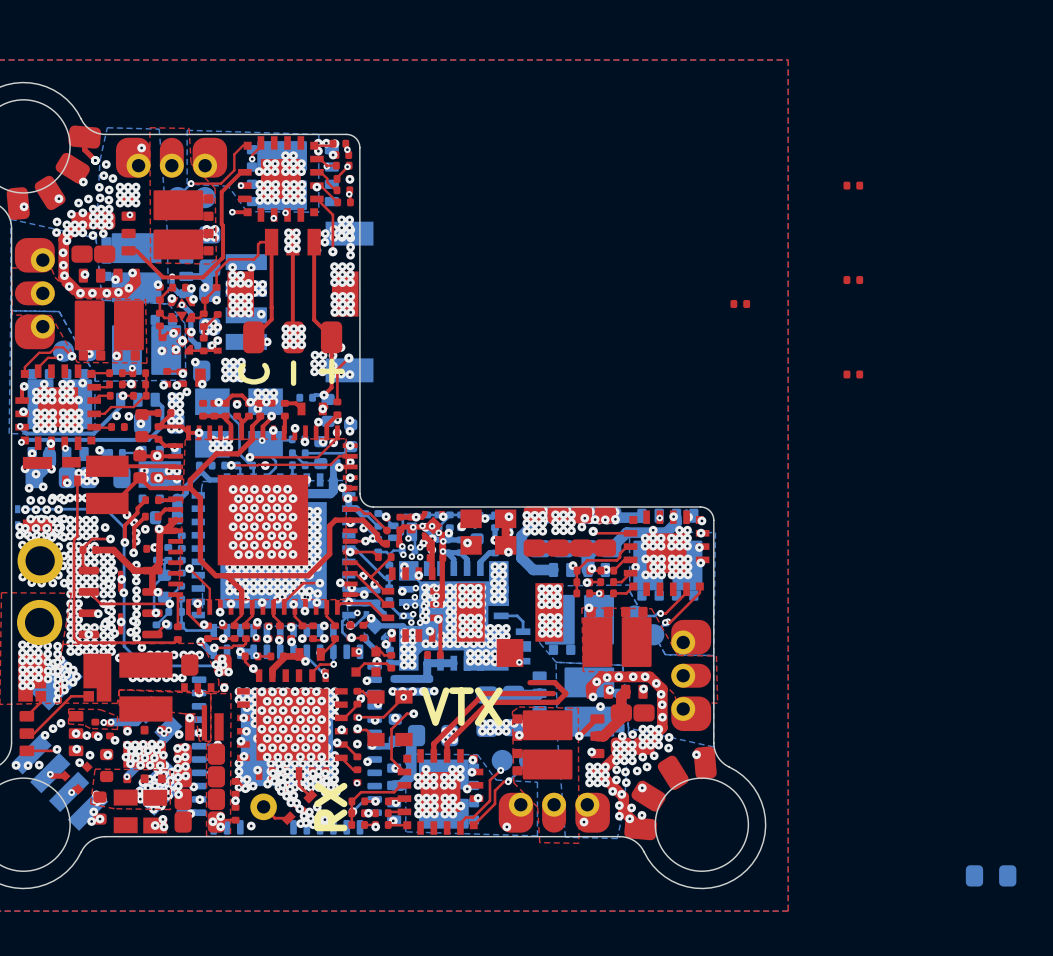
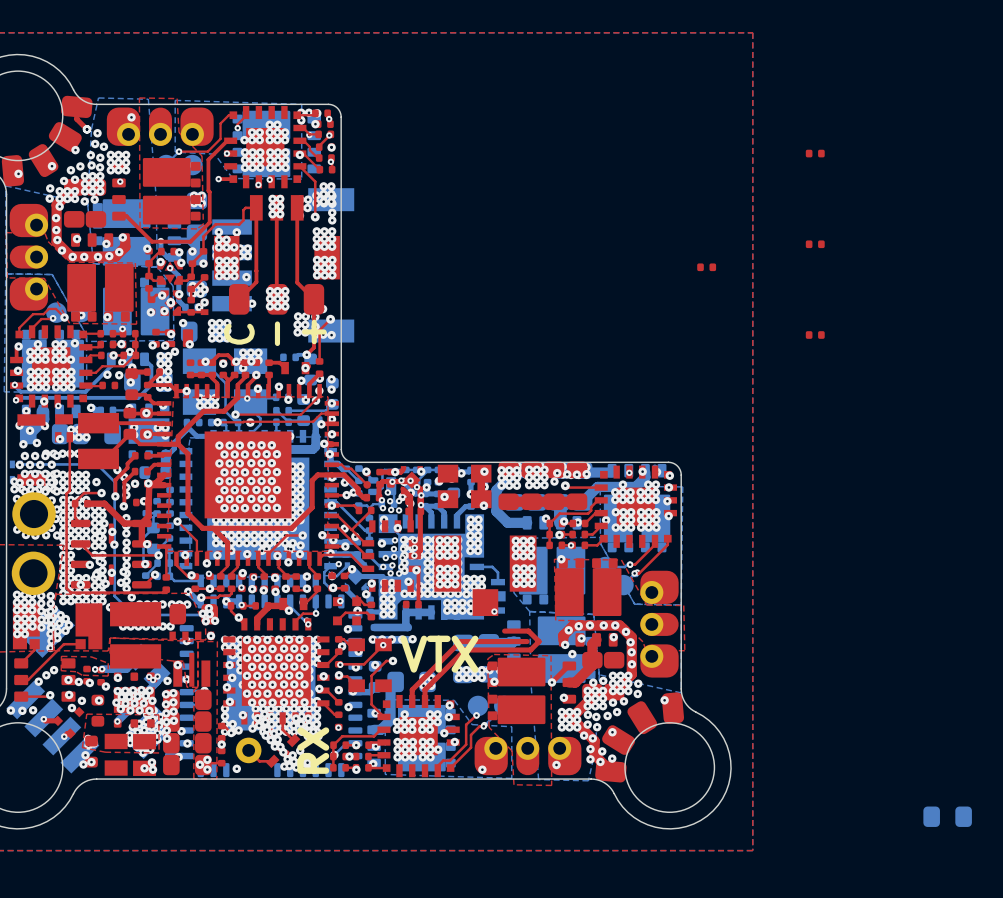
via: none -> (129, 351)
via: none -> (122, 362)
via: none -> (132, 367)

